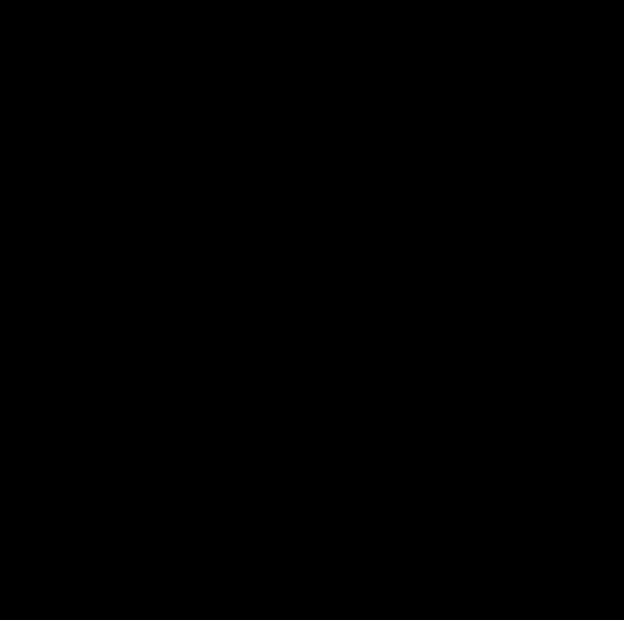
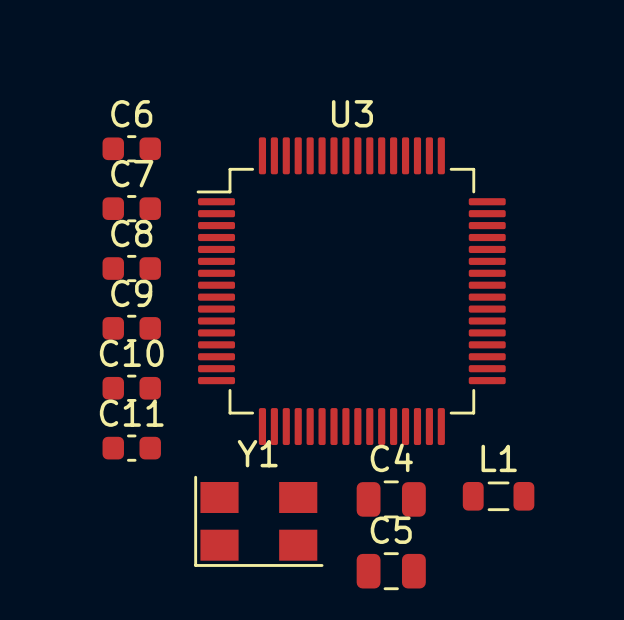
C6: none -> (131, 148)
C7: none -> (131, 208)
C8: none -> (131, 268)
U3: none -> (351, 291)
C9: none -> (131, 328)
C10: none -> (131, 388)
C11: none -> (131, 448)
L1: none -> (498, 496)
C4: none -> (391, 499)
Y1: none -> (258, 521)
C5: none -> (391, 571)

